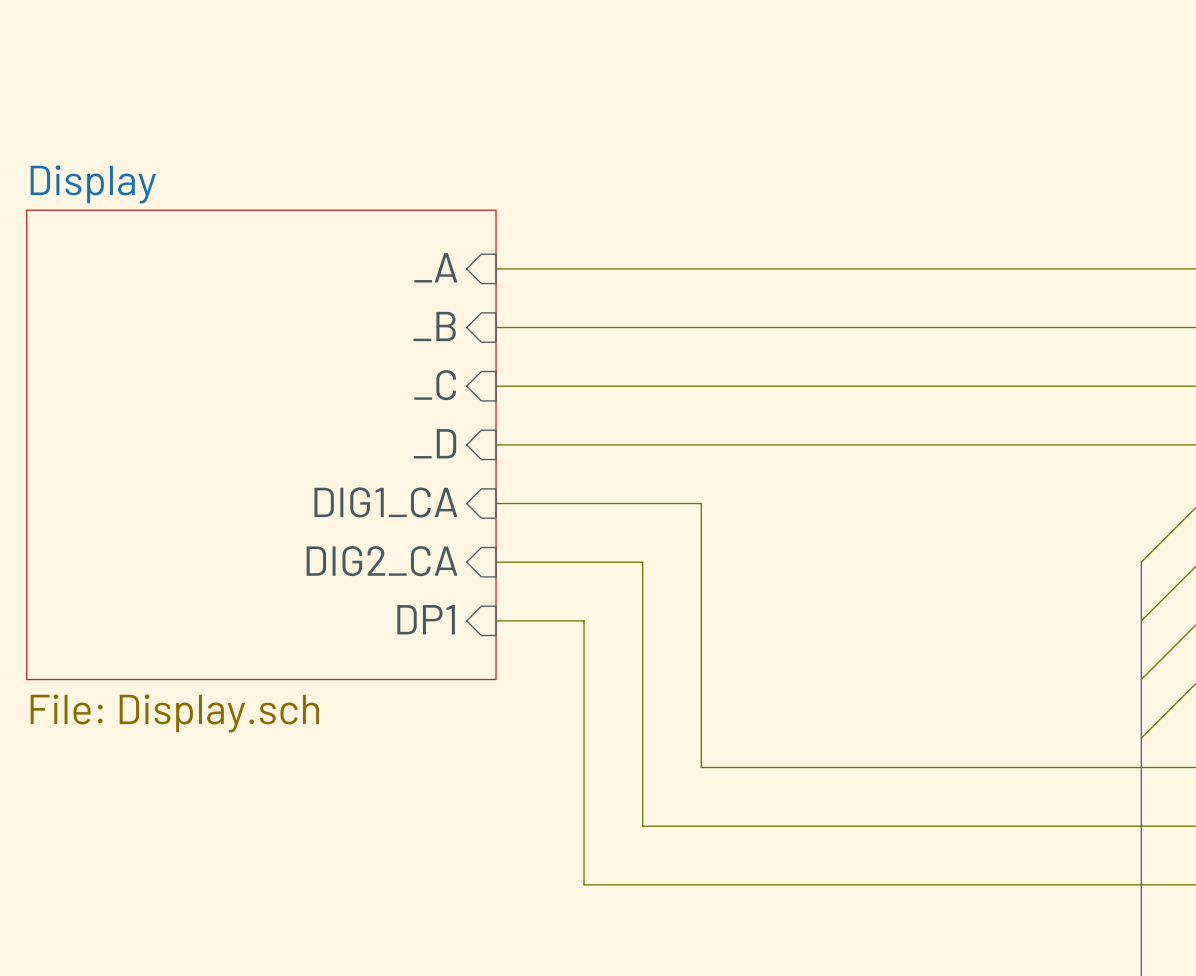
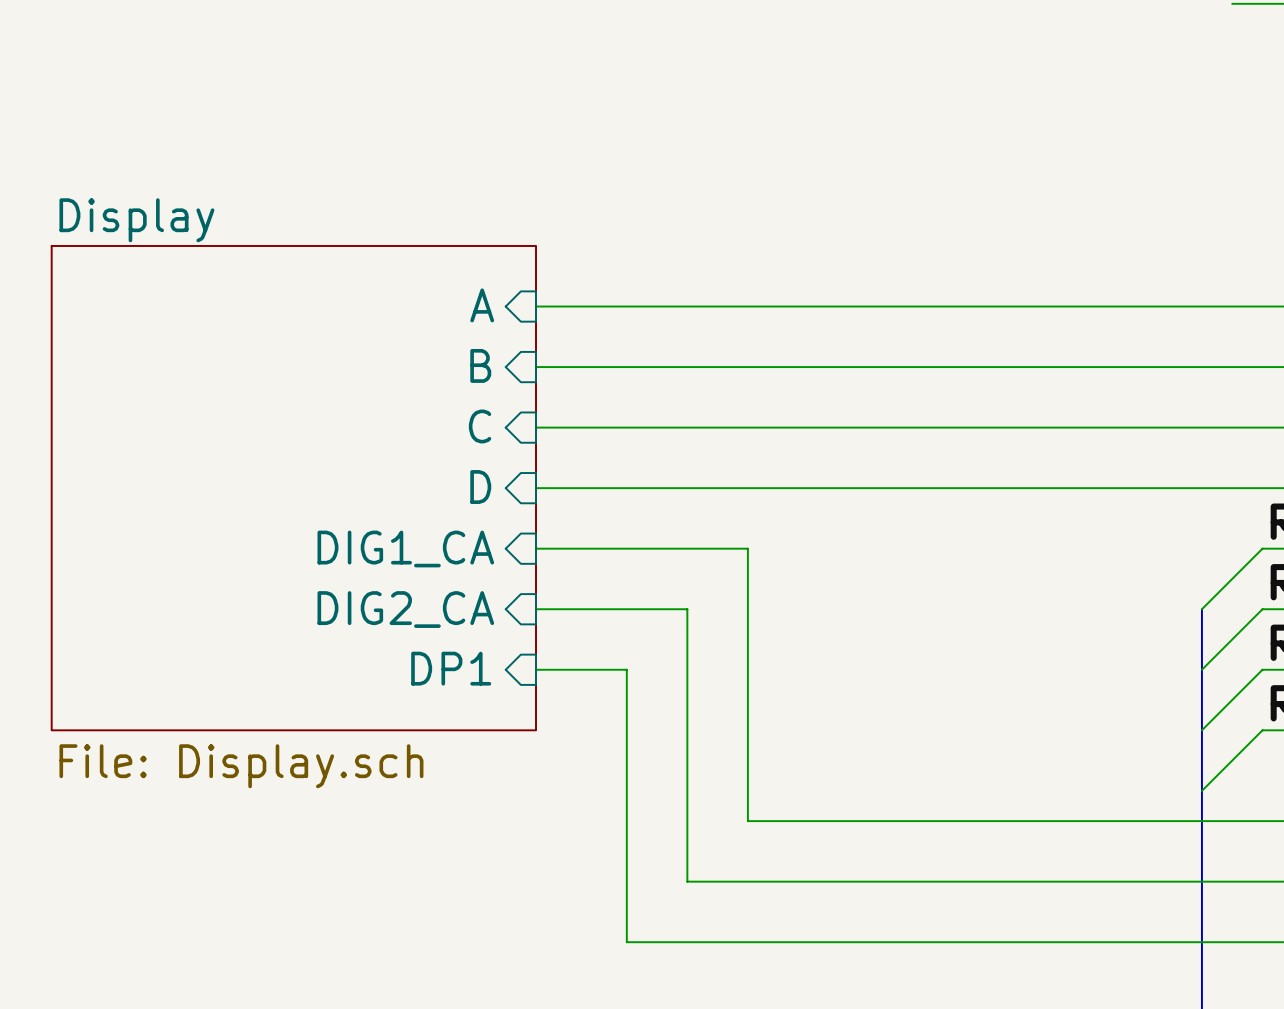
sheet pin: _A (435, 267) -> A (482, 305)
sheet pin: _B (434, 326) -> B (480, 365)
sheet pin: _C (435, 385) -> C (480, 426)
sheet pin: _D (435, 443) -> D (480, 487)

